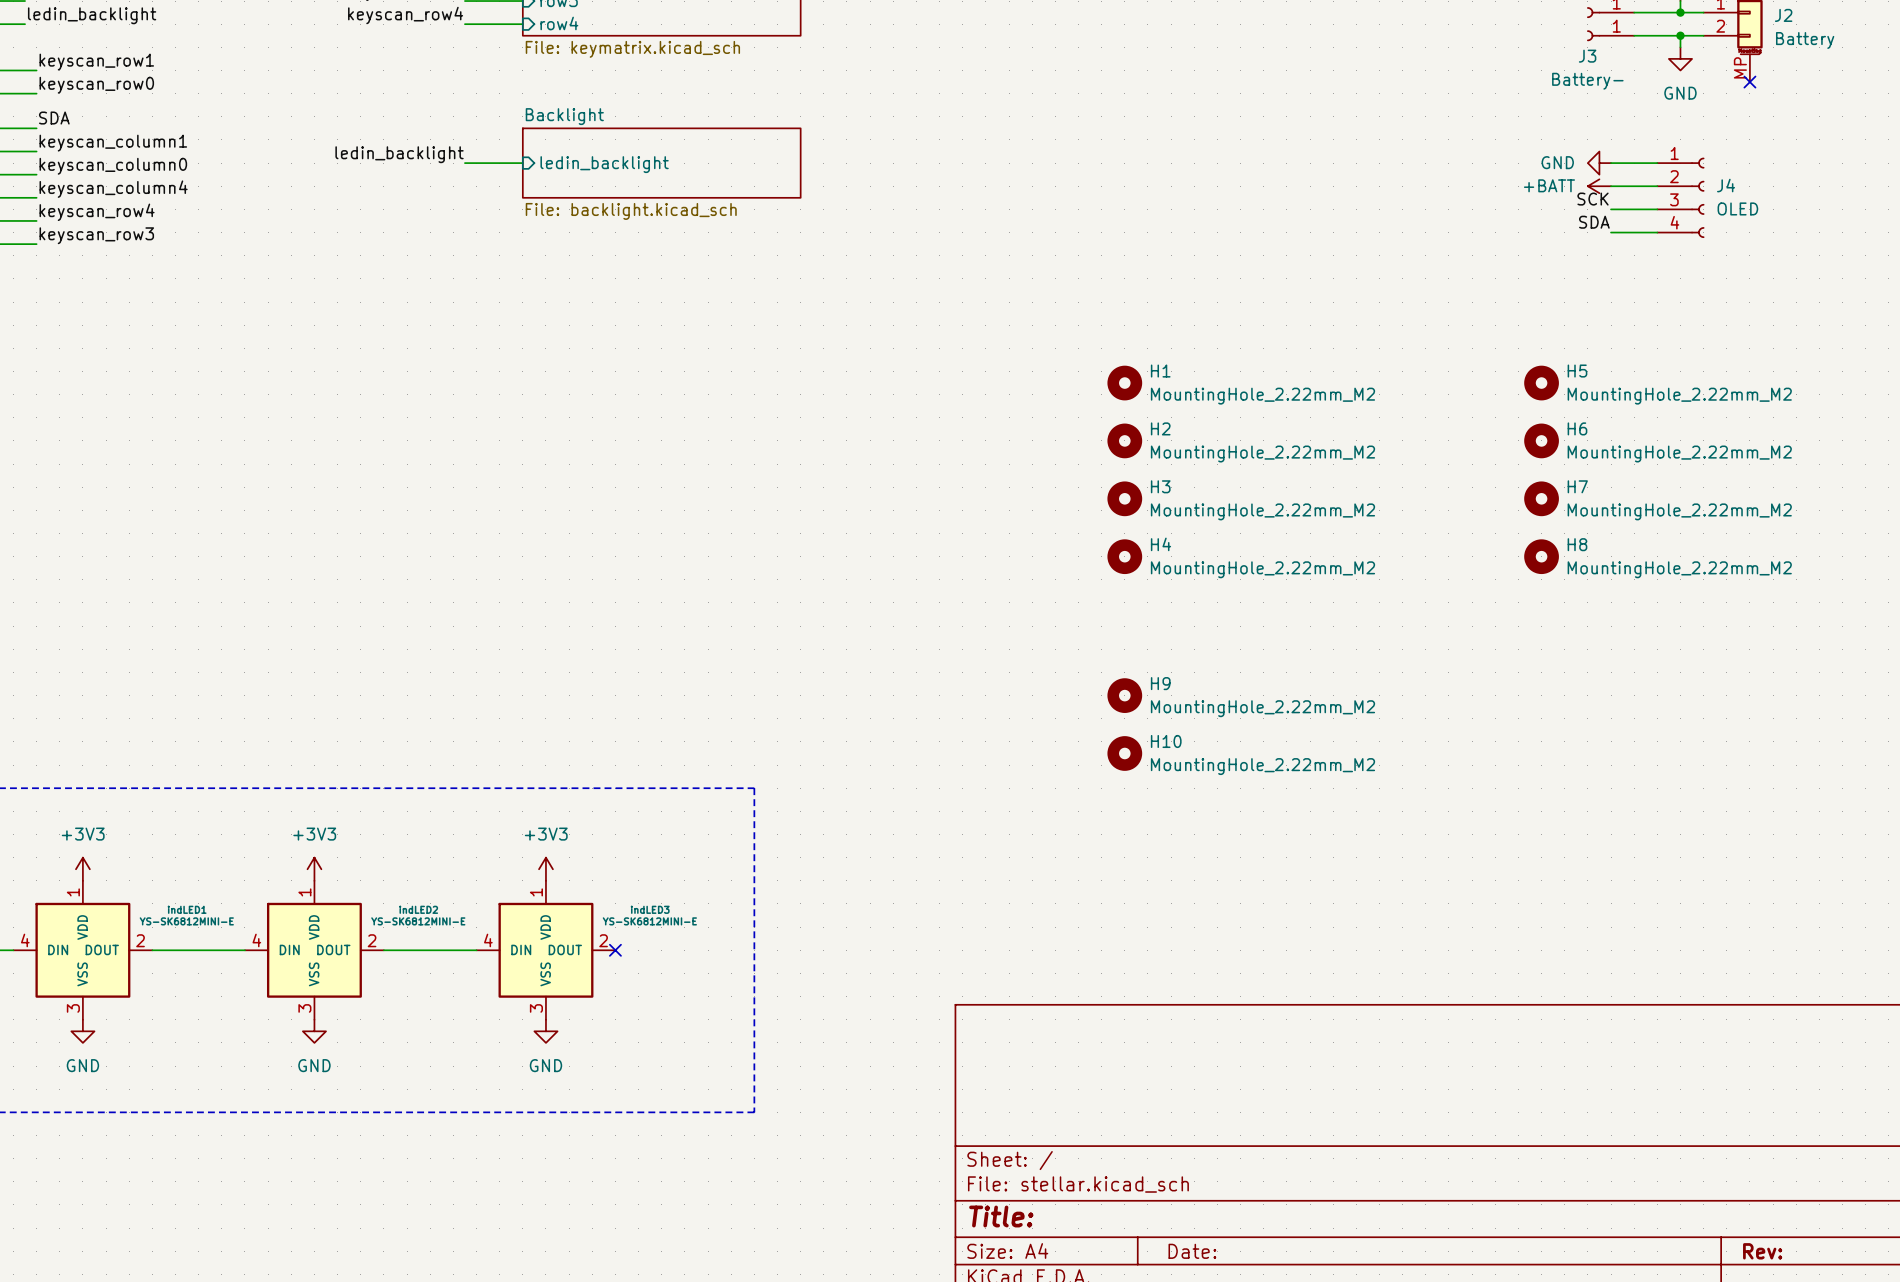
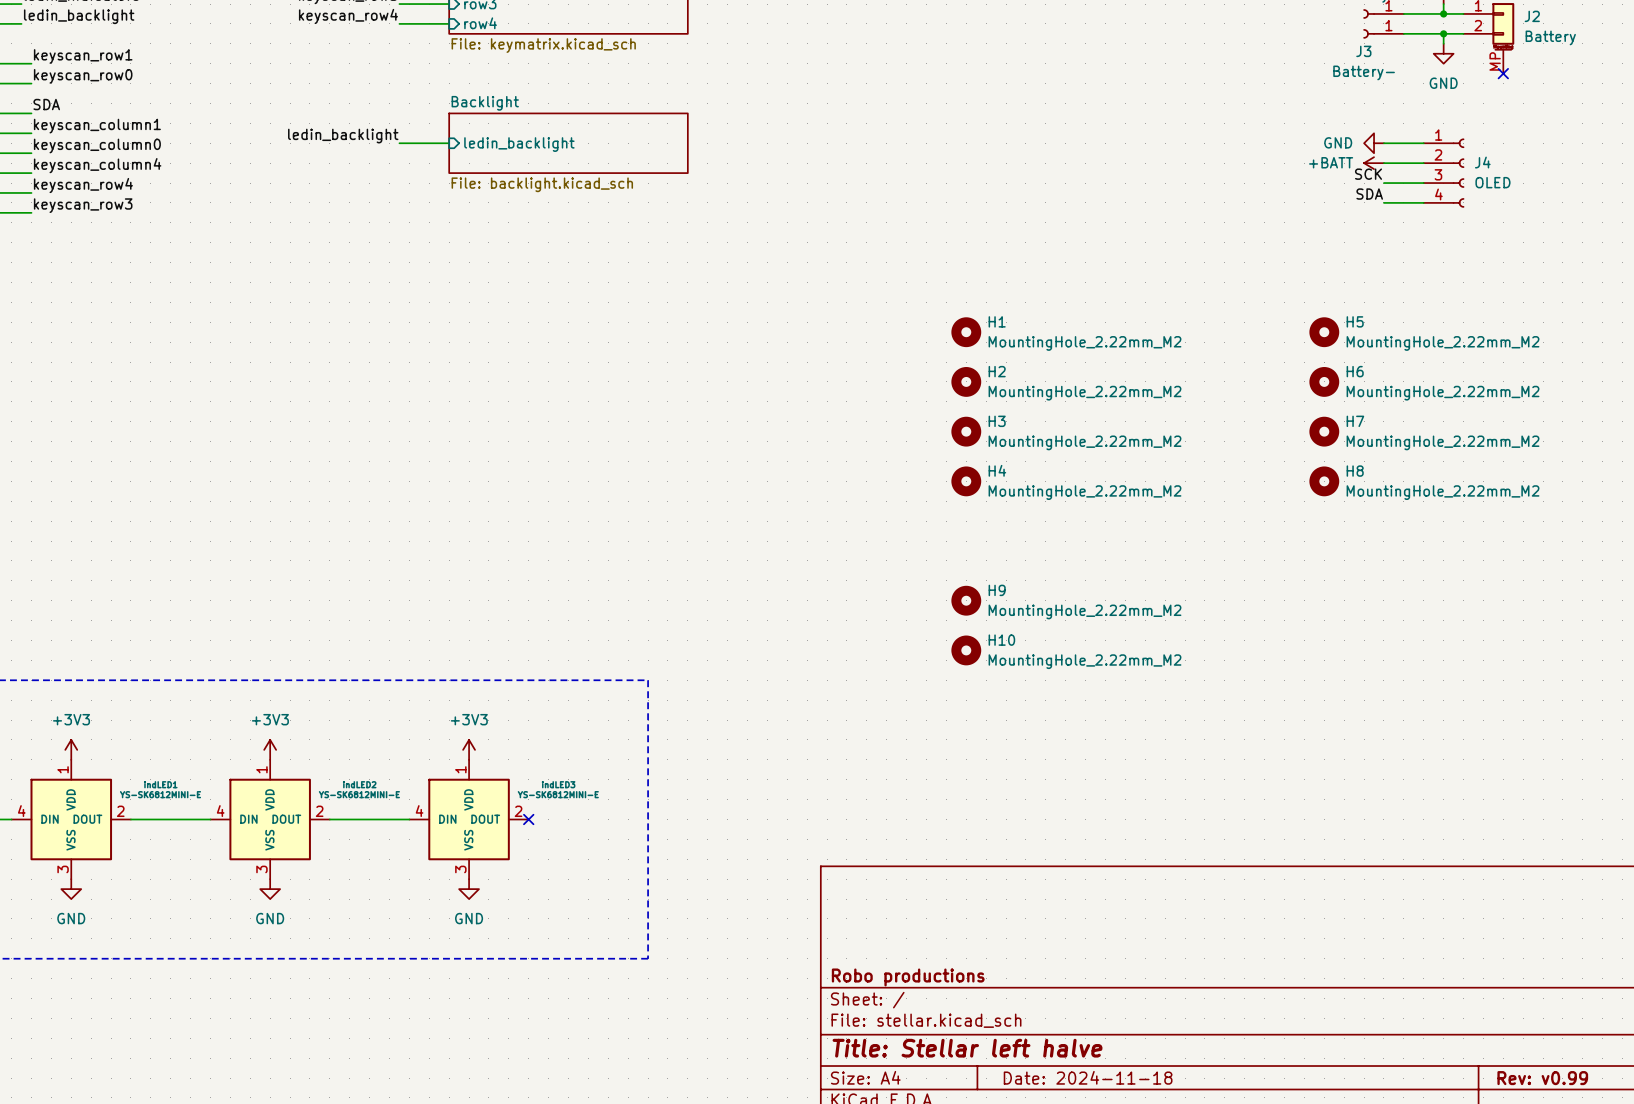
title block: none -> Robo productions (908, 977)
title block: Title: (1001, 1216) -> Title: Stellar left halve (967, 1048)
title block: Date: (1192, 1251) -> Date: 2024-11-18 (1088, 1077)
title block: Rev: (1762, 1251) -> Rev: v0.99 (1542, 1078)

